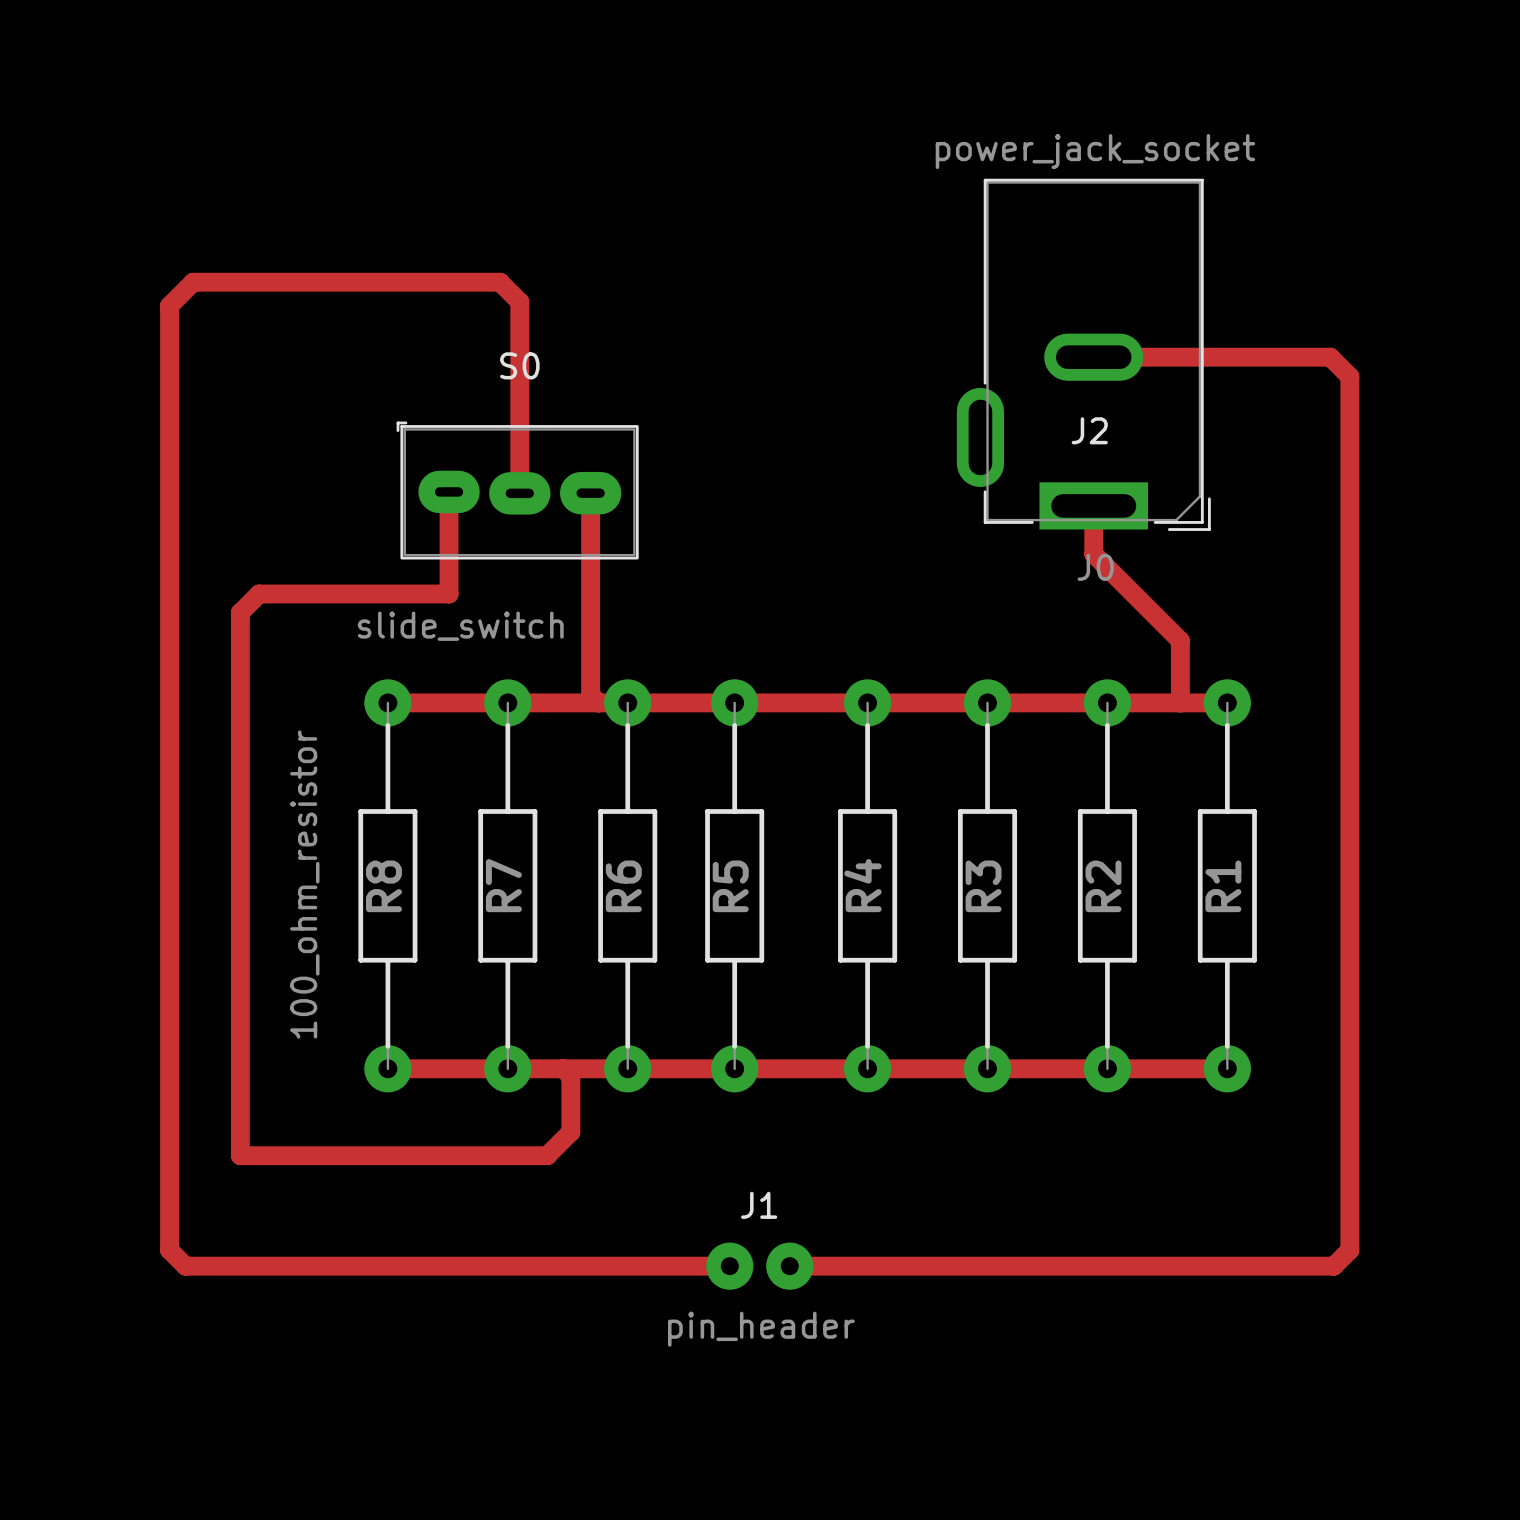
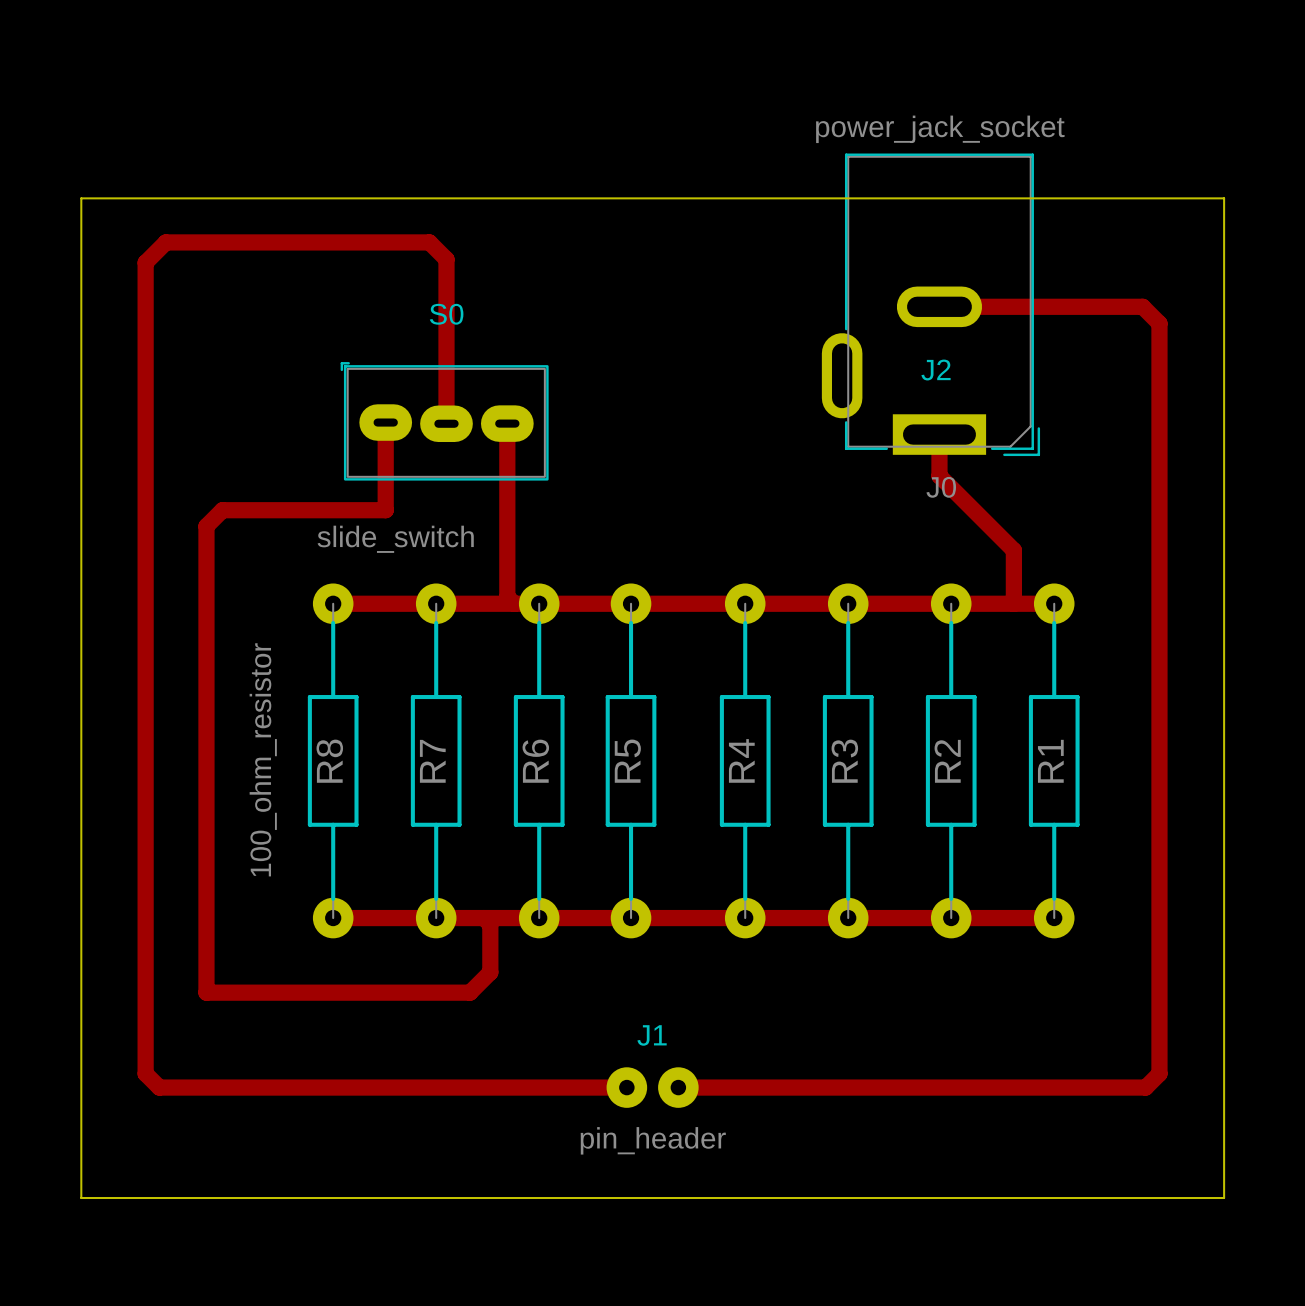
board edge: none -> (81, 198) (1224, 198) (1224, 1198) (81, 1198) (81, 198)

